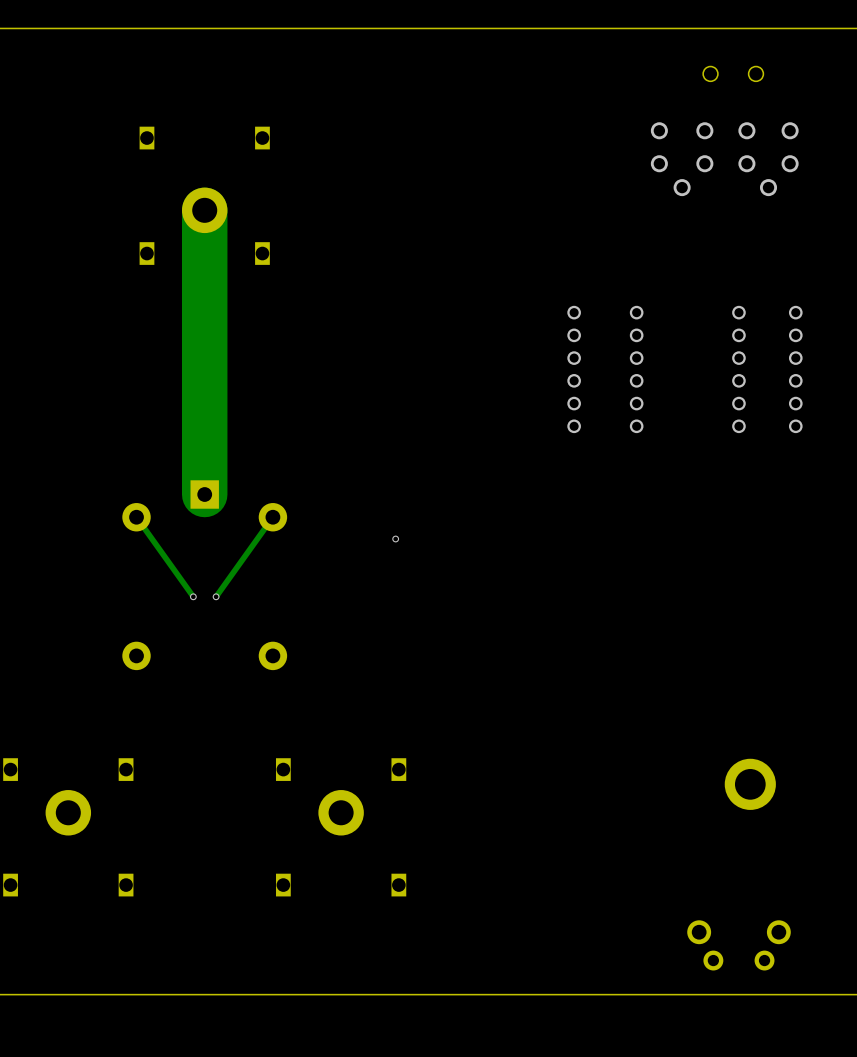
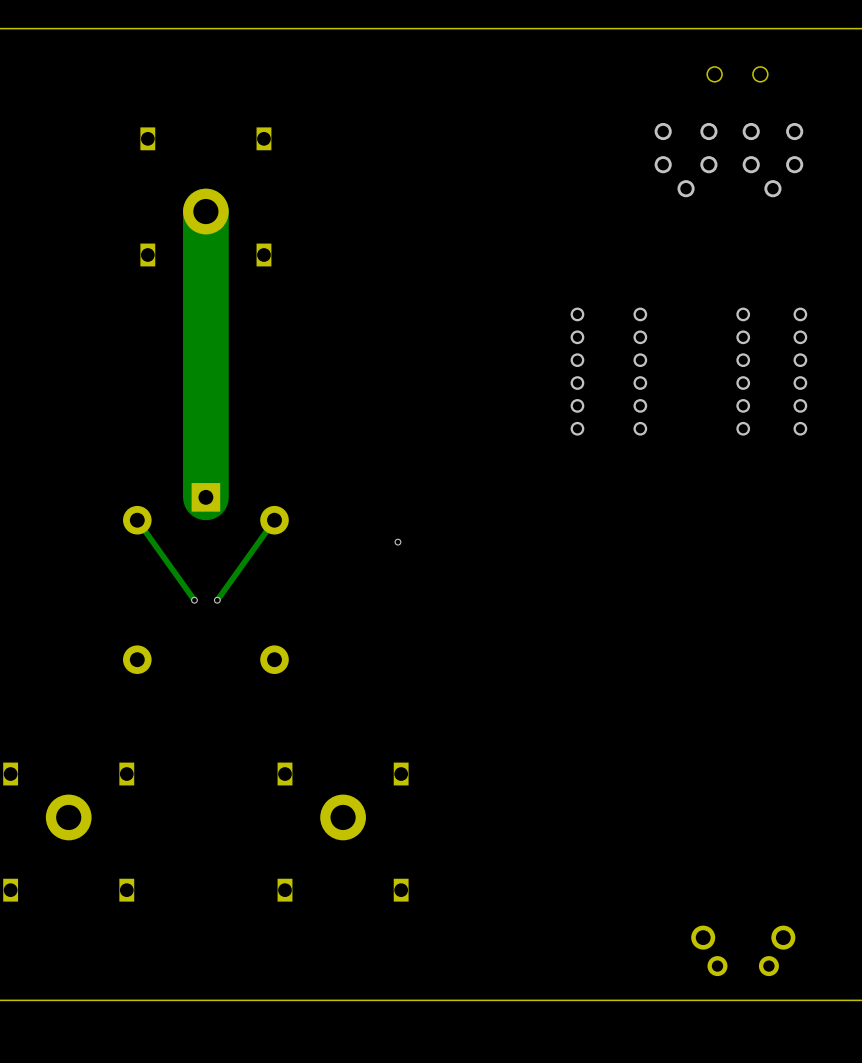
part: (750, 784) -> none

